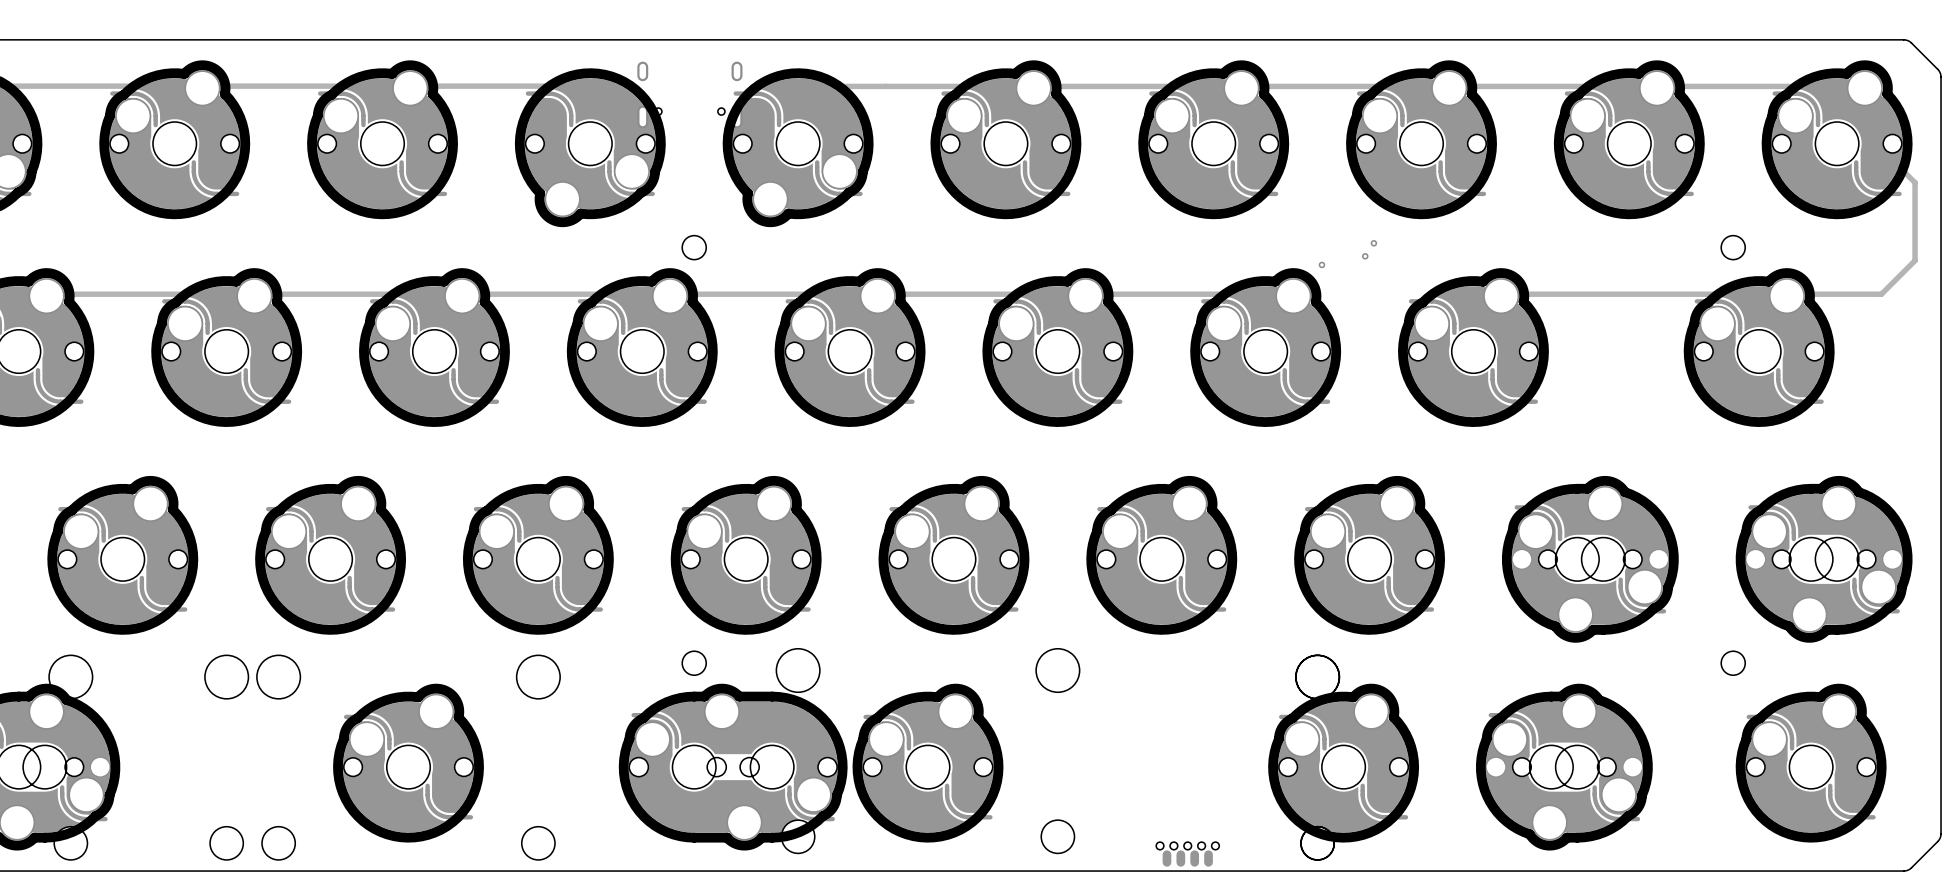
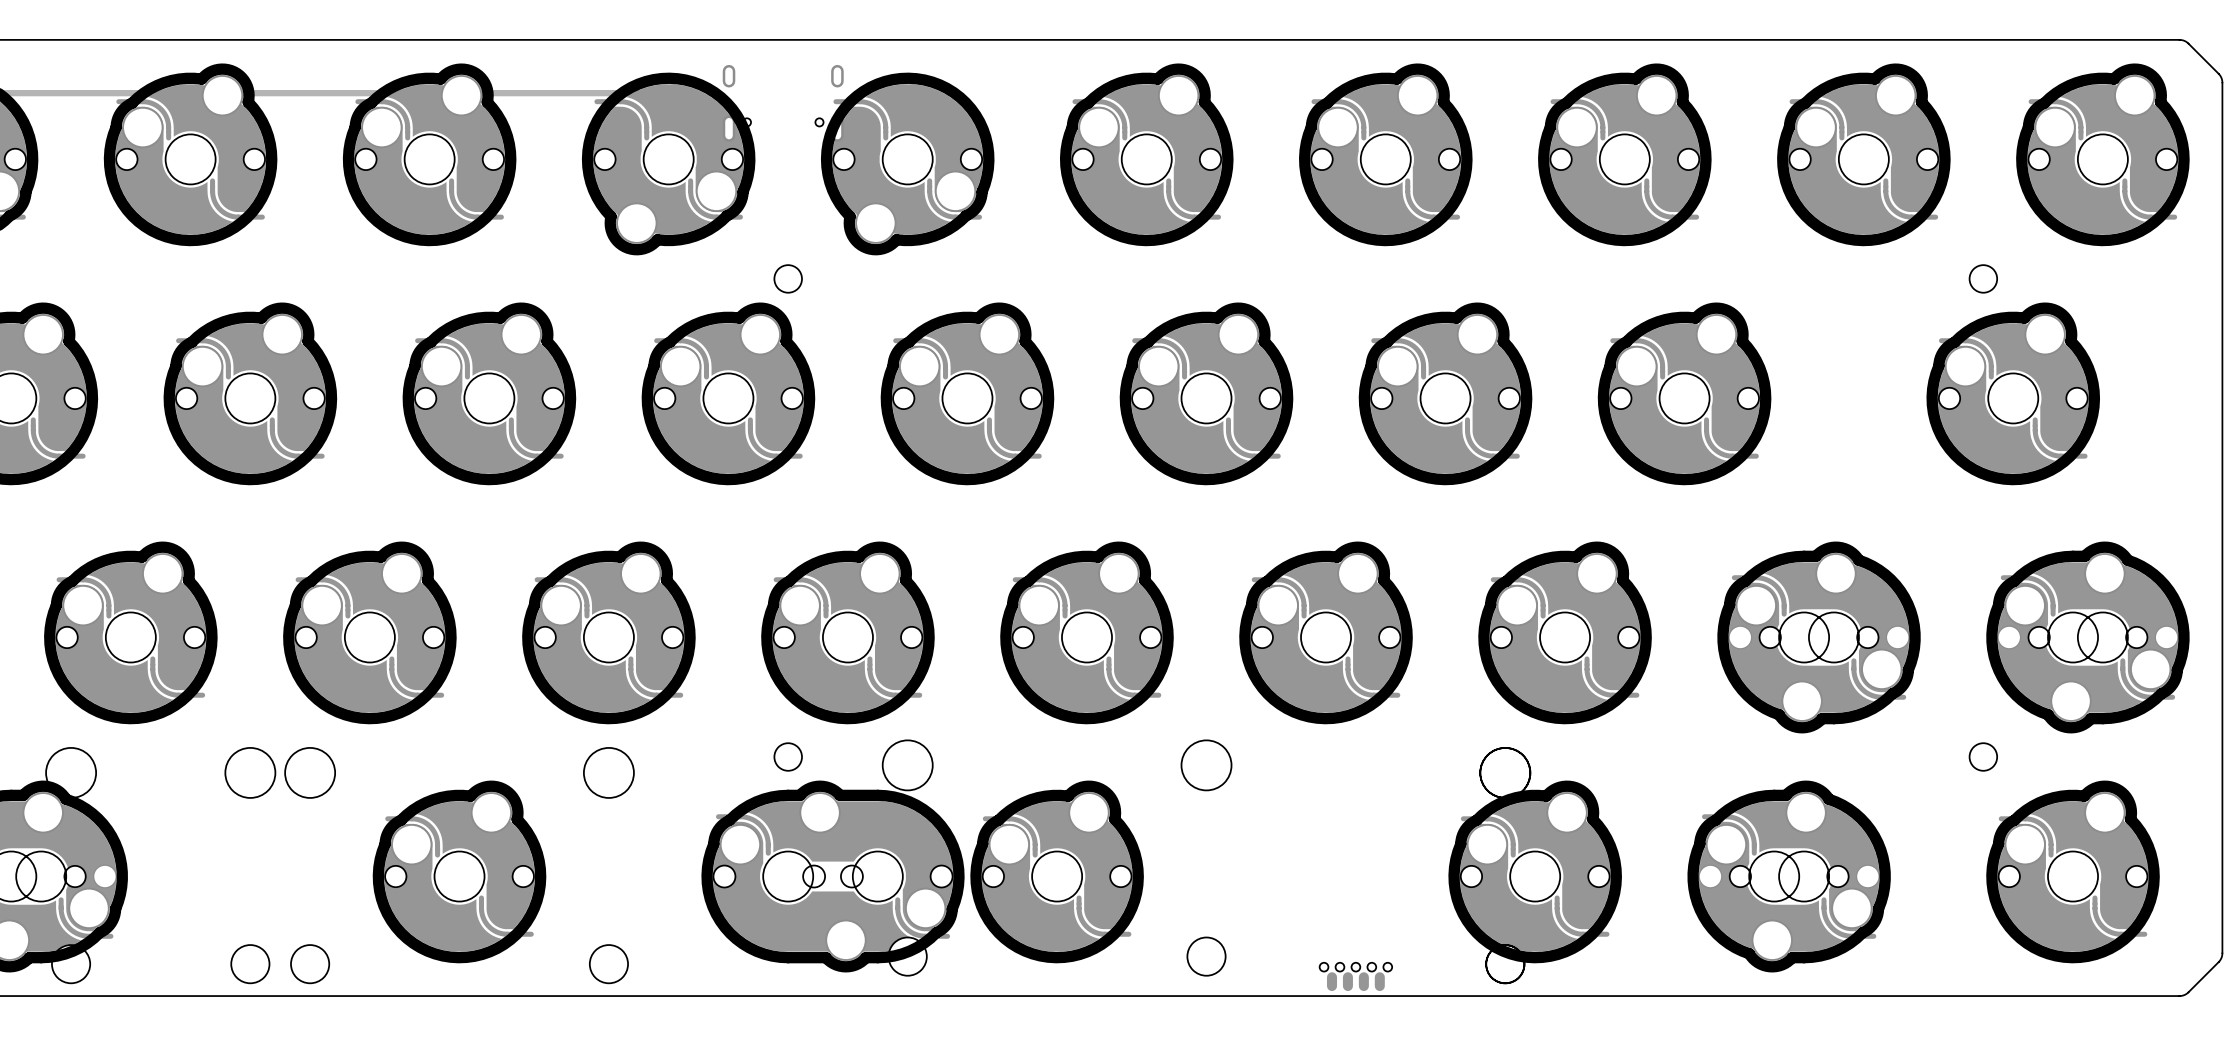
track: (798, 86) (1862, 86) -> none
track: (1890, 158) (1915, 182) (1915, 260) (1881, 294) (1503, 294) -> none
via: (1373, 243) -> none
via: (1365, 256) -> none
via: (1321, 264) -> none
track: (1246, 294) (48, 294) (46, 296) -> none

